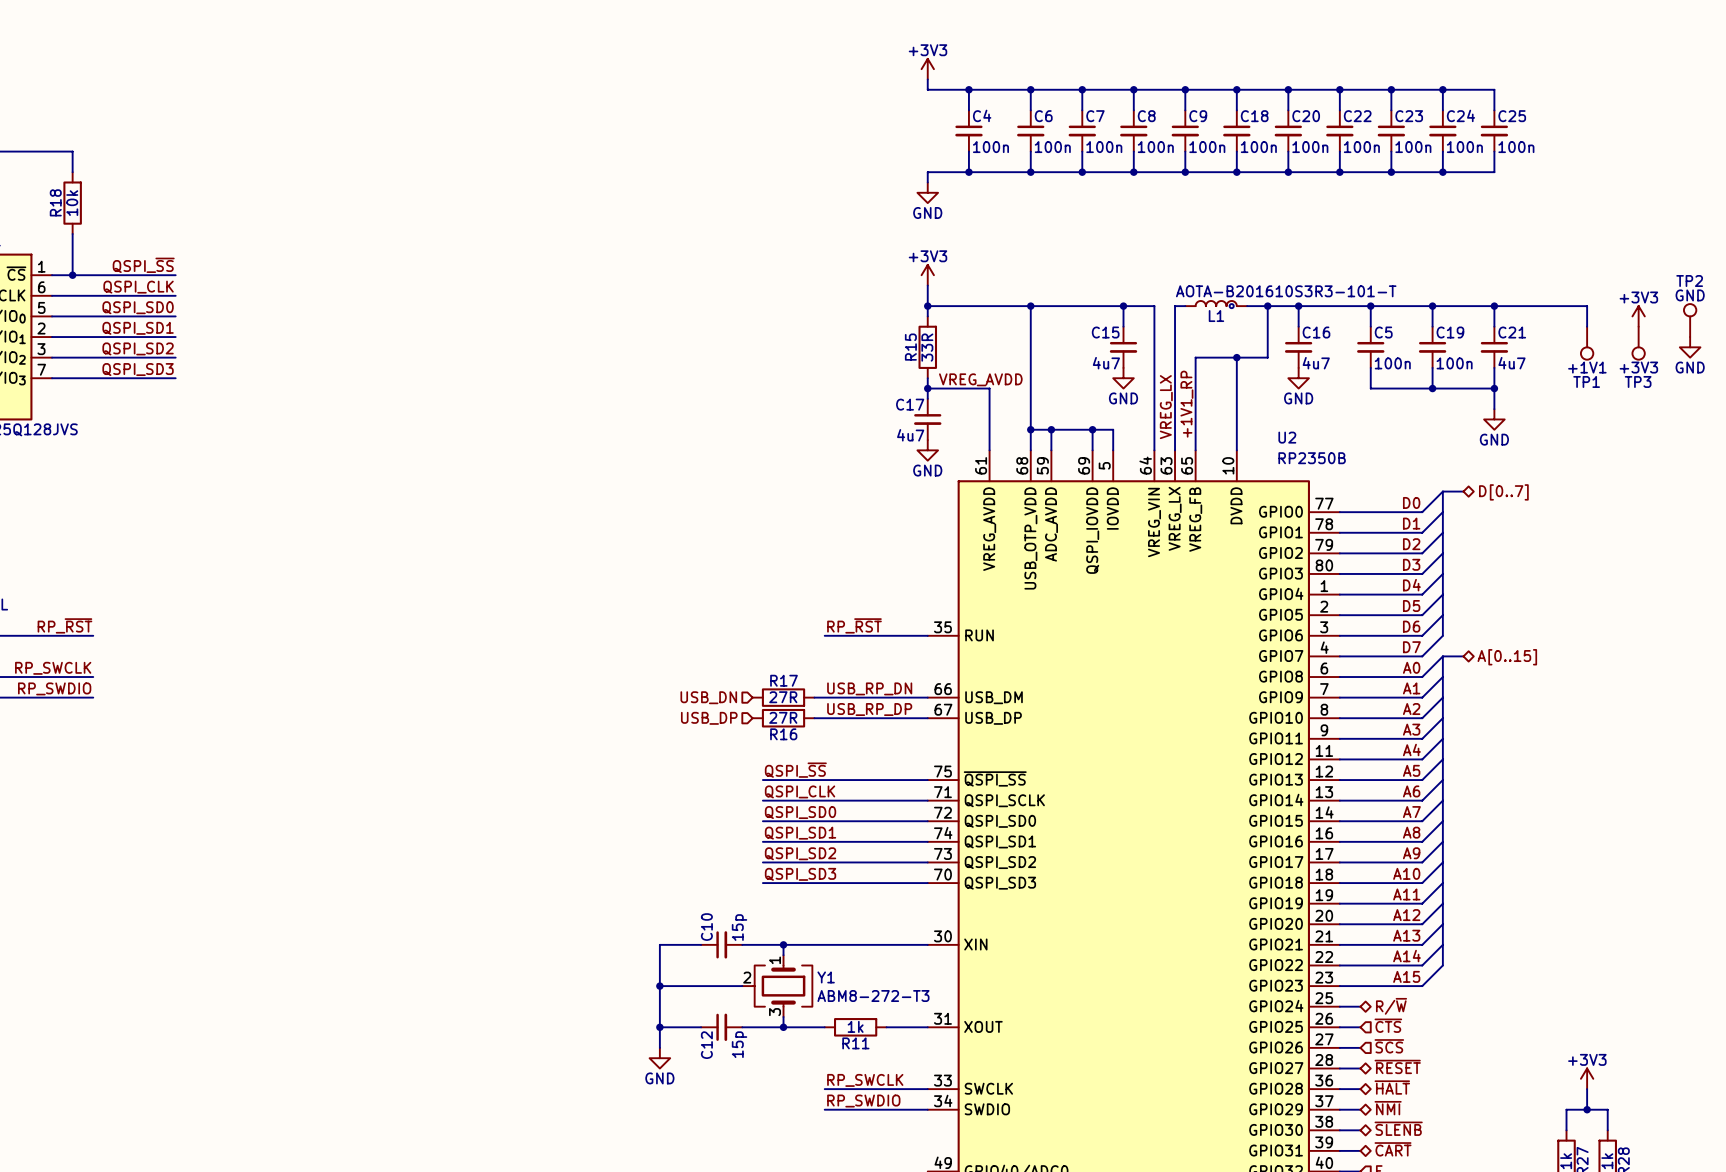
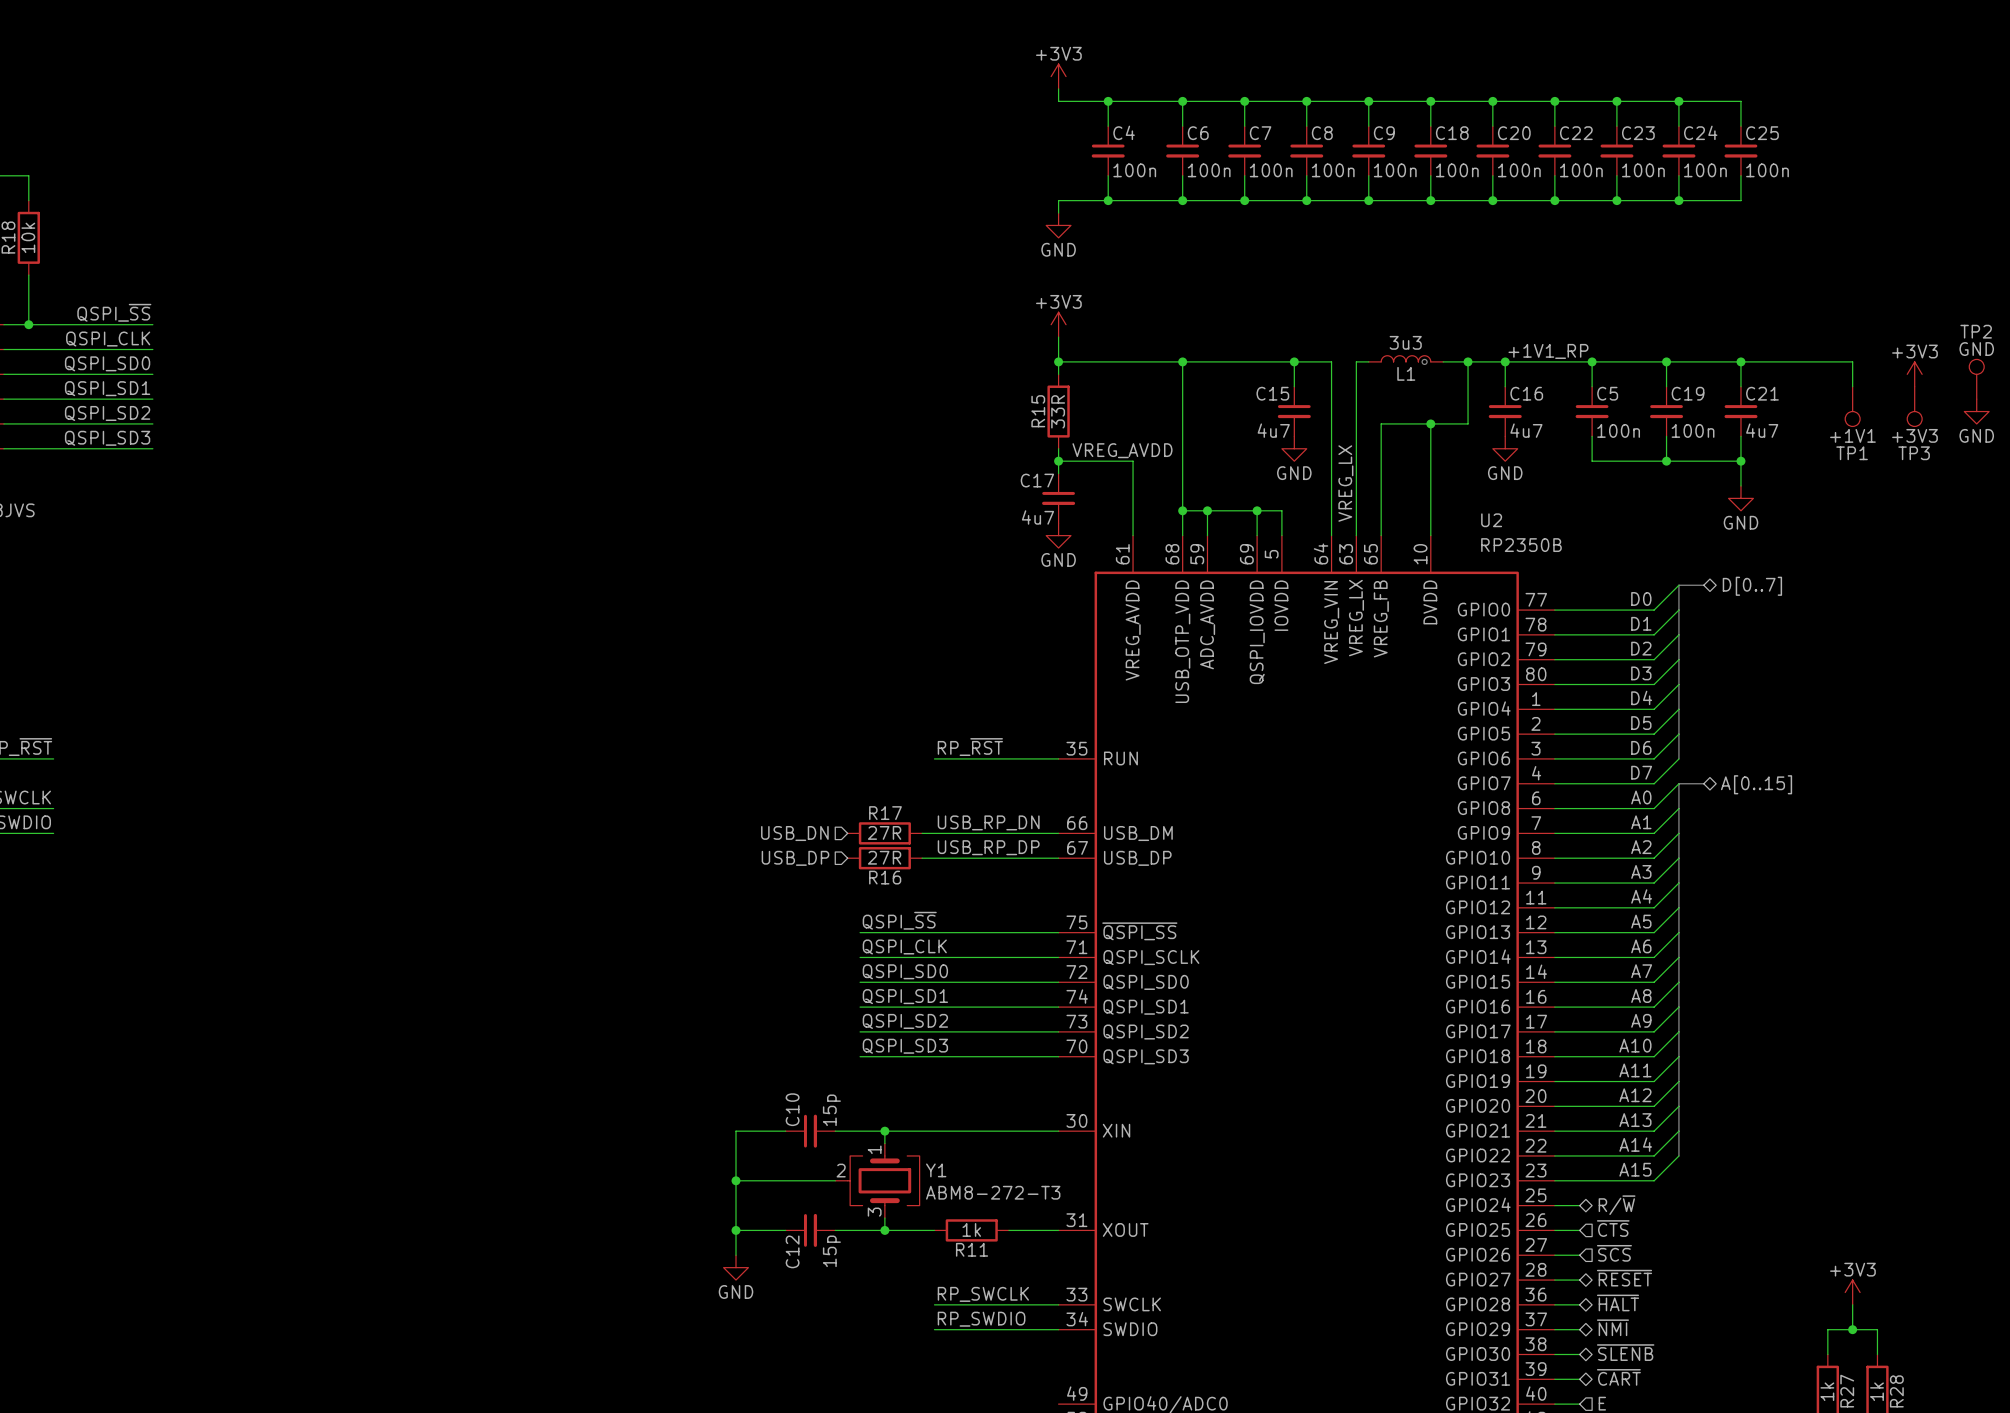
L1 value: AOTA-B201610S3R3-101-T (1286, 291) -> 3u3 (1405, 342)
label rotation: 0° (1186, 404) -> 90° clockwise (1548, 351)
label position: +1V1_RP (1186, 404) -> +1V1_RP (1548, 351)

